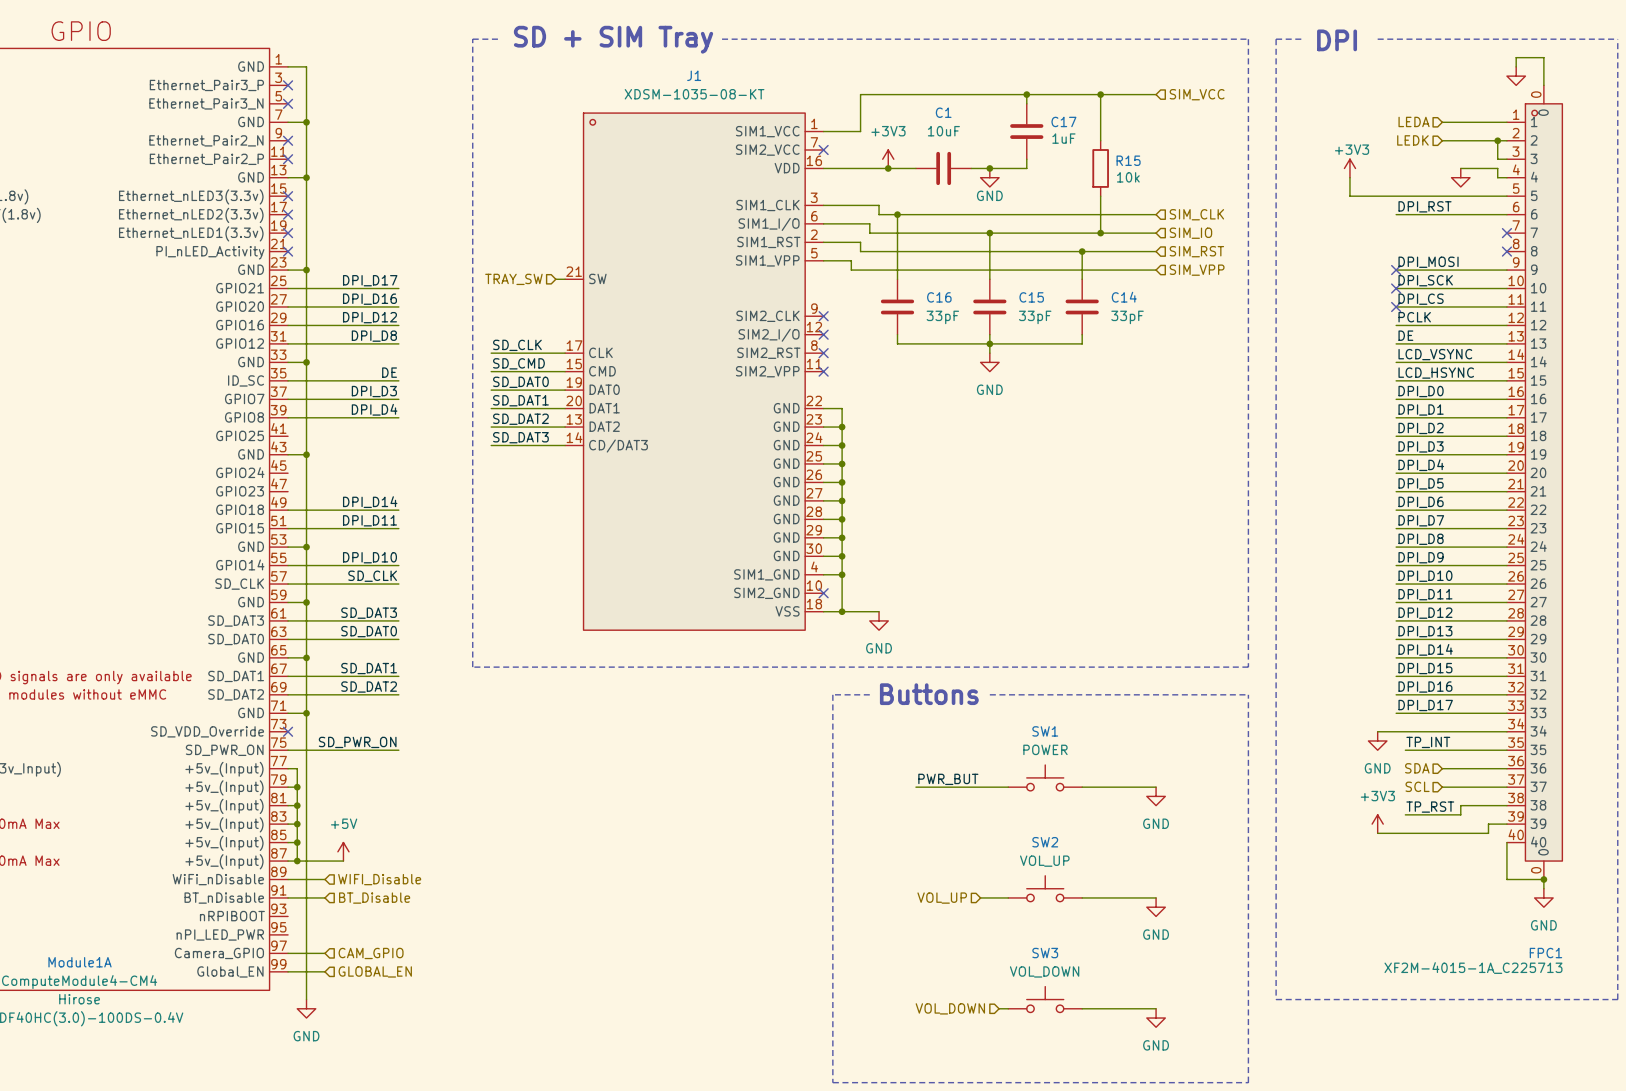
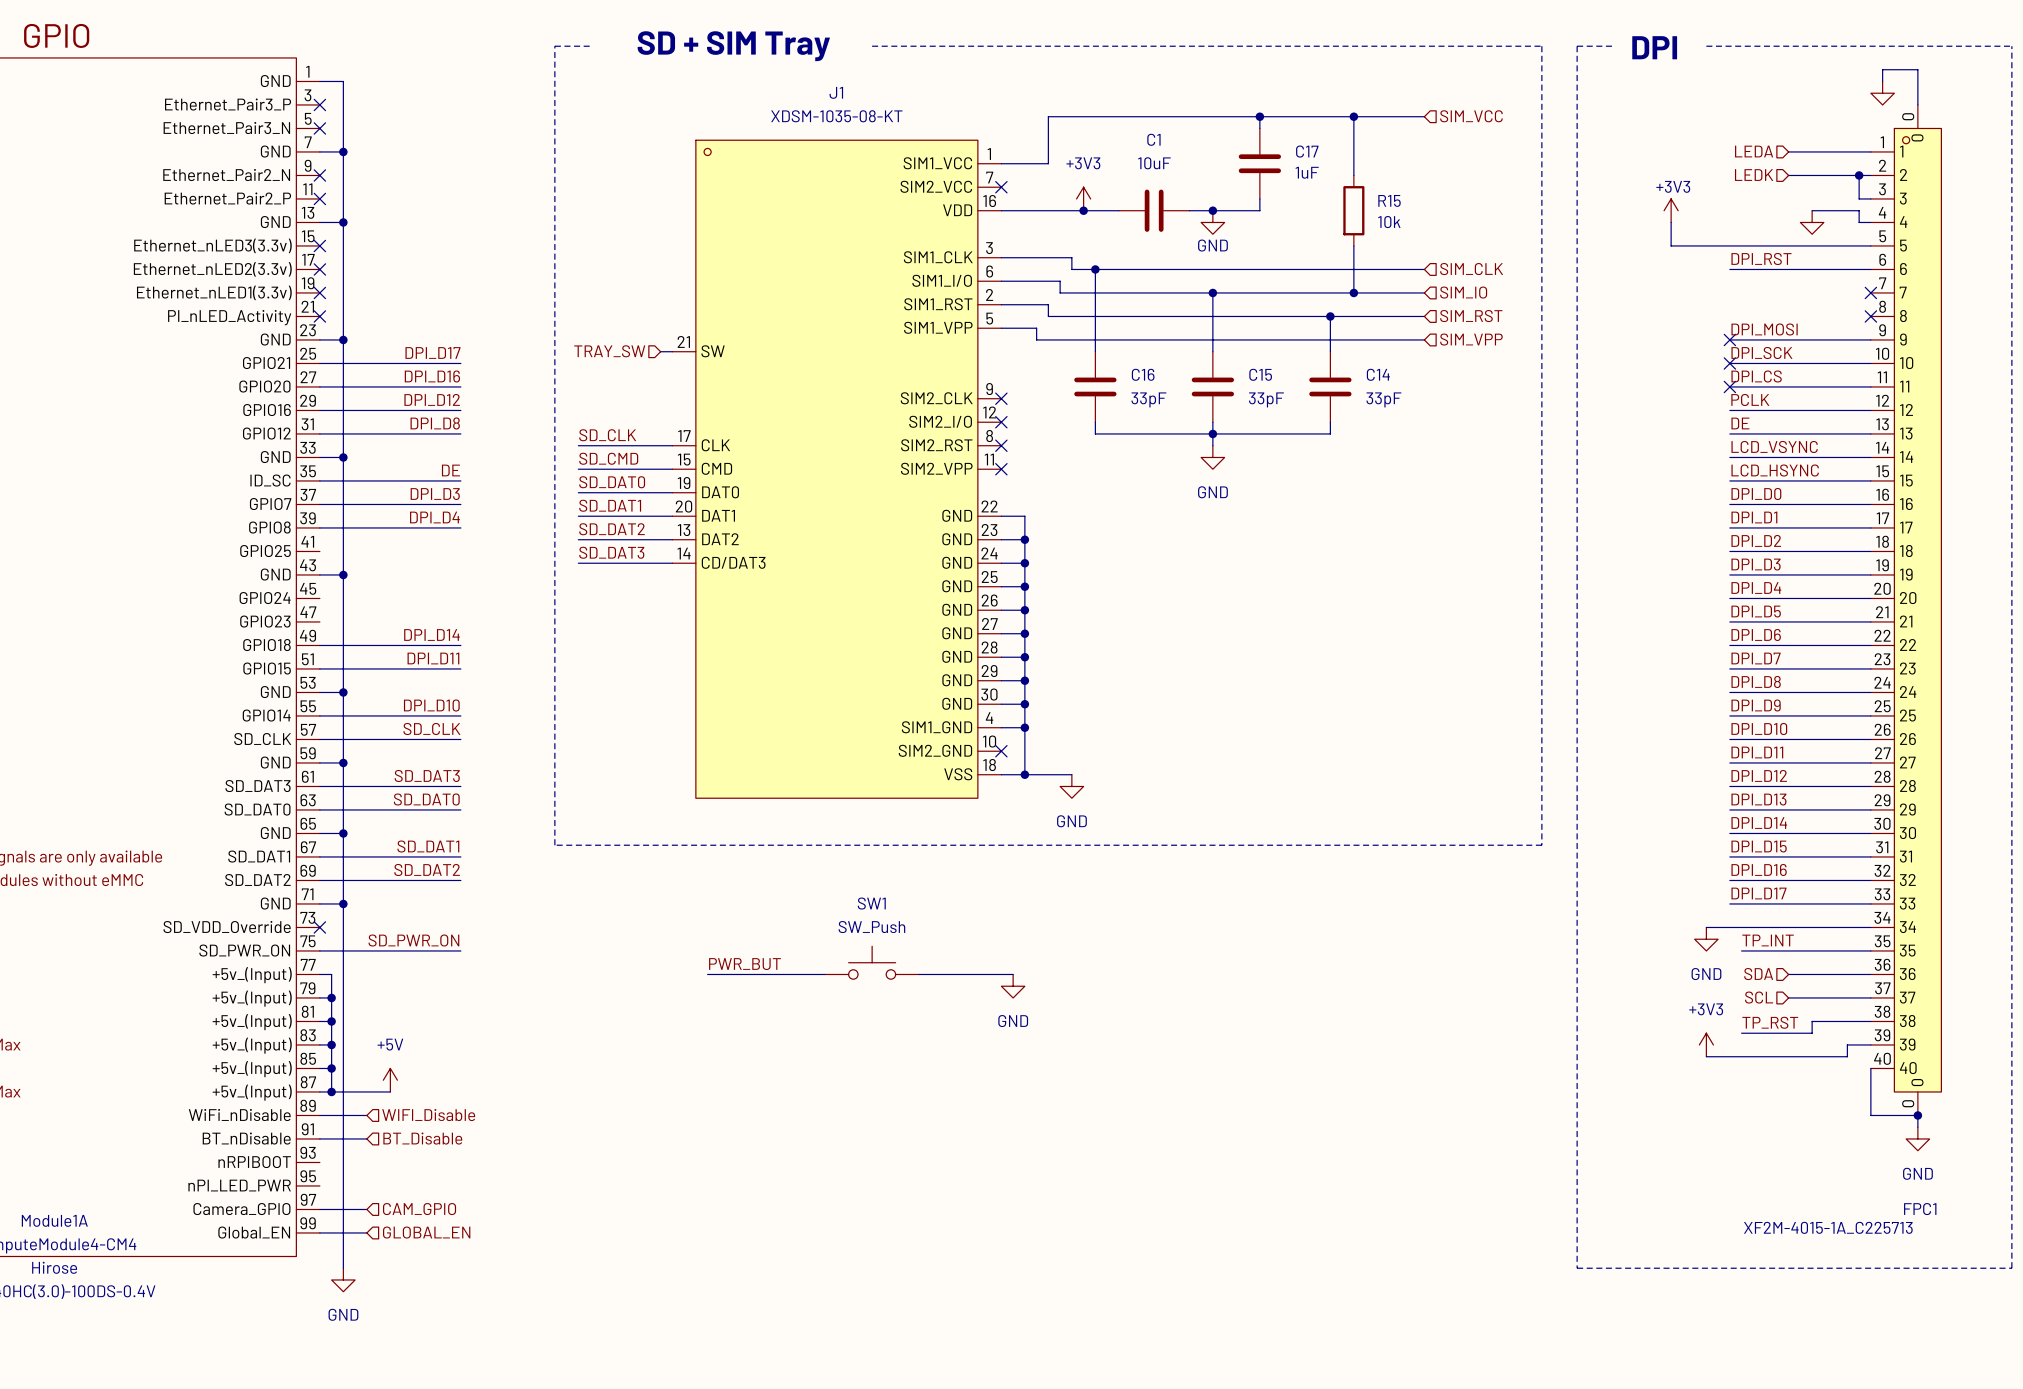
line: (869, 694) (832, 694) (832, 1082) (1248, 1082) (1248, 694) (989, 694) -> none
text: Buttons (929, 694) -> none
SW1 value: POWER (1045, 749) -> SW_Push (871, 927)
label: none -> PWR_BUT (745, 964)
wire: none -> (707, 974) (825, 974)
wire: none -> (919, 974) (1013, 974)
power symbol: none -> GND (1013, 986)
SW1 position: (1045, 777) -> (872, 962)
label: PWR_BUT (948, 779) -> none
wire: (915, 787) (1008, 787) -> none
wire: (1082, 787) (1156, 787) -> none
power symbol: GND (1156, 796) -> none
SW2: VOL_UP (1045, 888) -> none
wire: (980, 897) (1008, 897) -> none
wire: (1082, 897) (1156, 897) -> none
hierarchical label: VOL_UP (942, 898) -> none
power symbol: GND (1156, 907) -> none
SW3: VOL_DOWN (1045, 999) -> none
hierarchical label: VOL_DOWN (950, 1008) -> none
wire: (999, 1008) (1008, 1008) -> none
wire: (1082, 1008) (1156, 1008) -> none
power symbol: GND (1156, 1018) -> none

